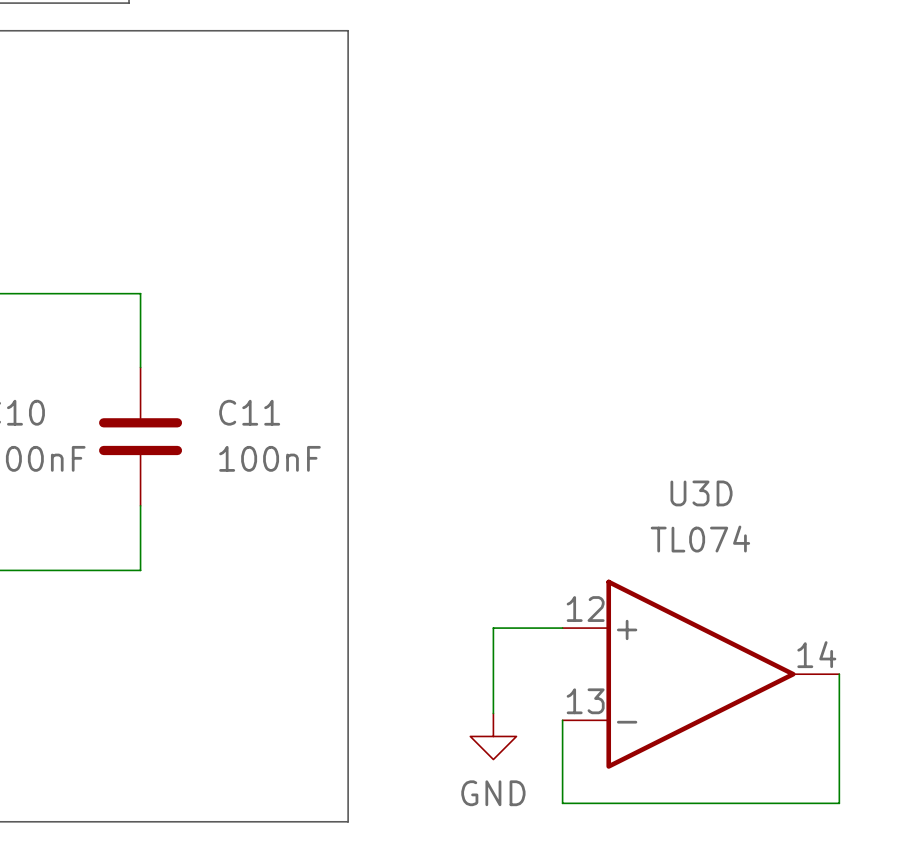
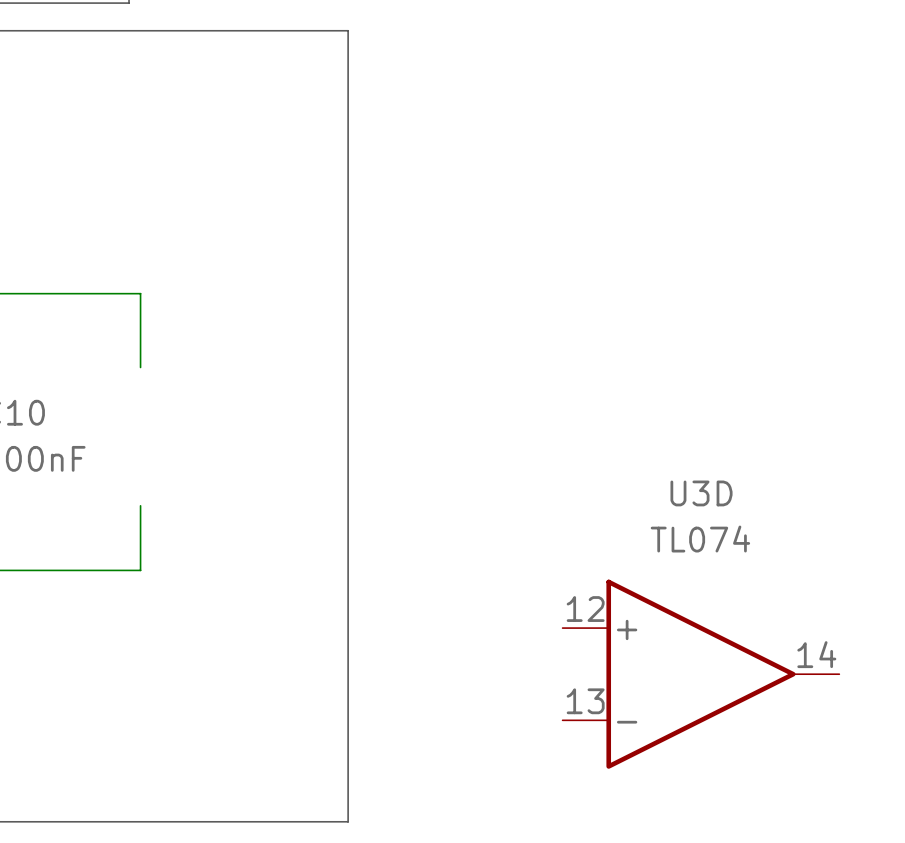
C11: 100nF (140, 436) -> none
wire: (562, 628) (493, 628) (493, 713) -> none
wire: (839, 674) (839, 803) (562, 803) (562, 720) -> none
power symbol: GND (493, 736) -> none

